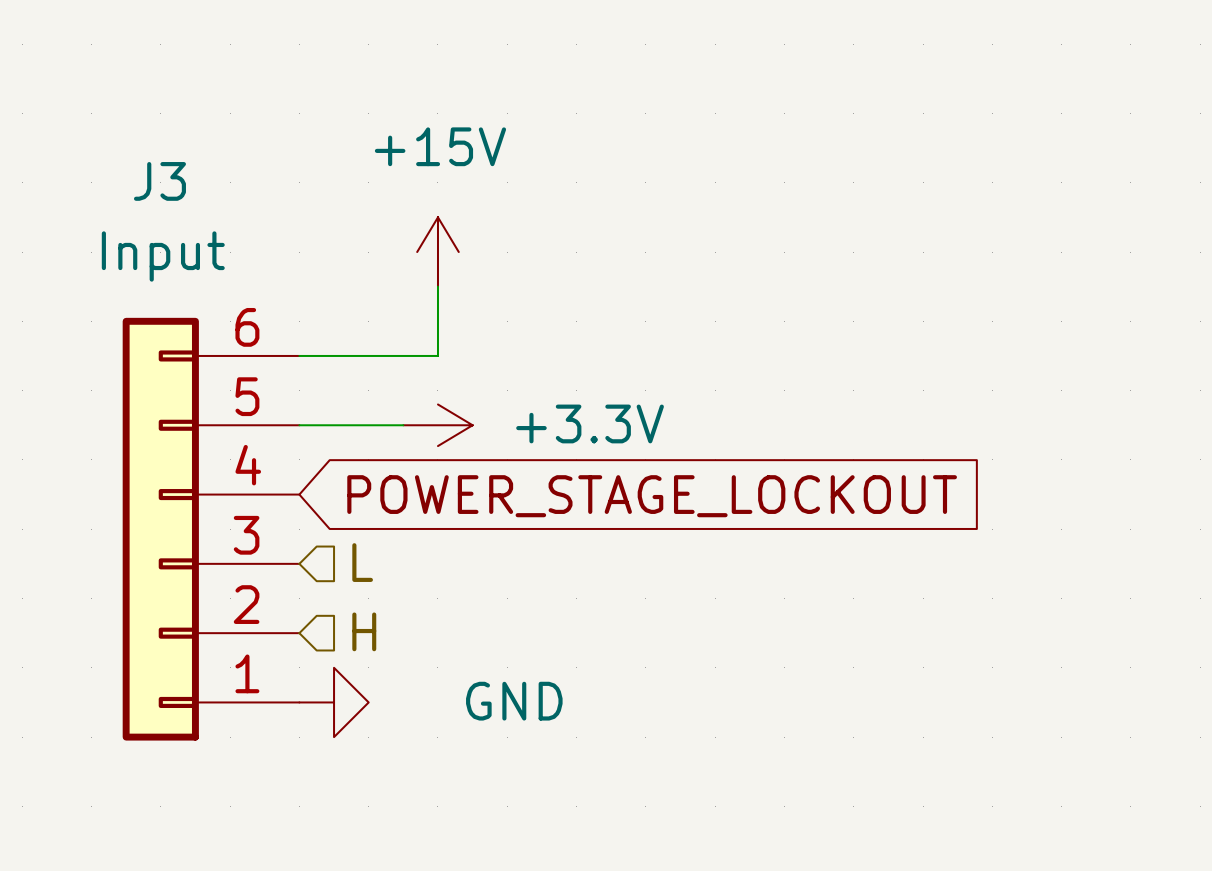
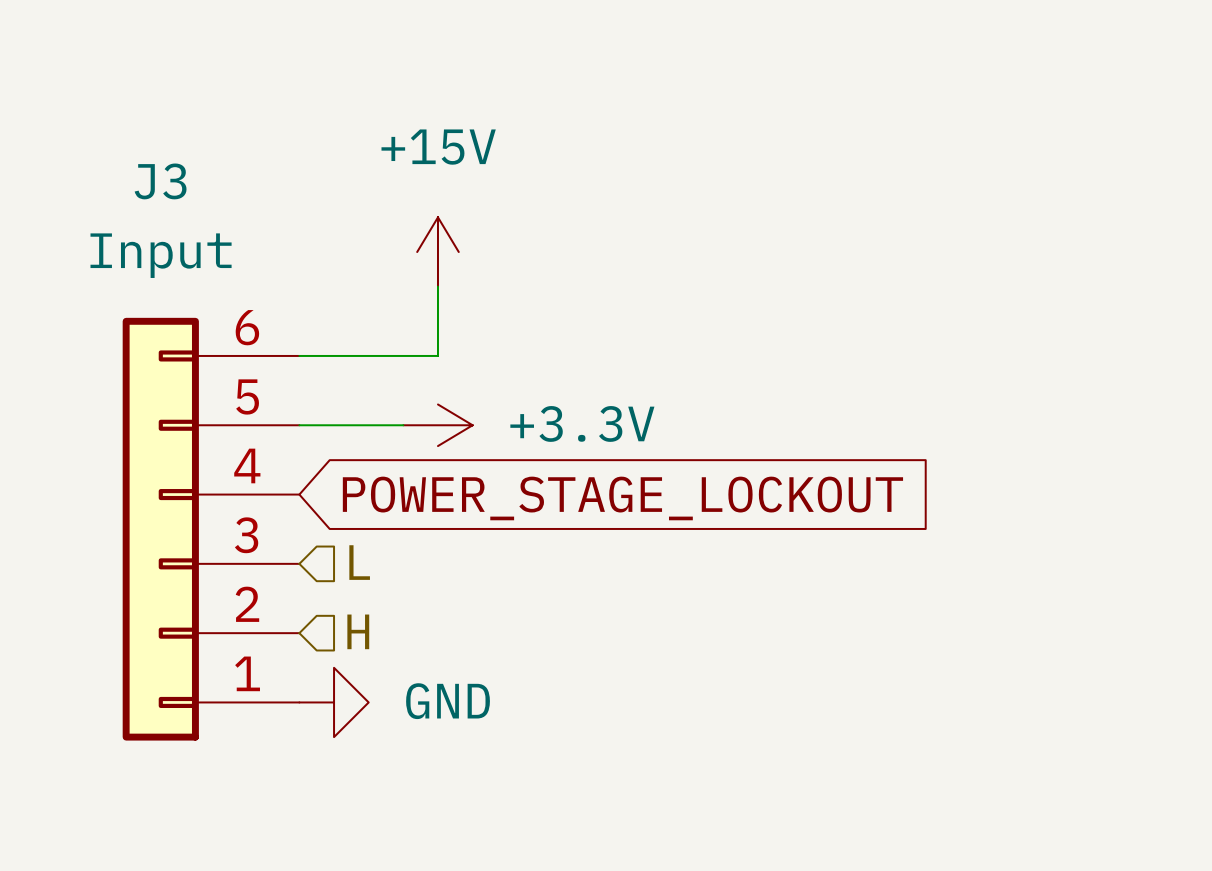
power symbol text position: GND (514, 701) -> GND (448, 701)

